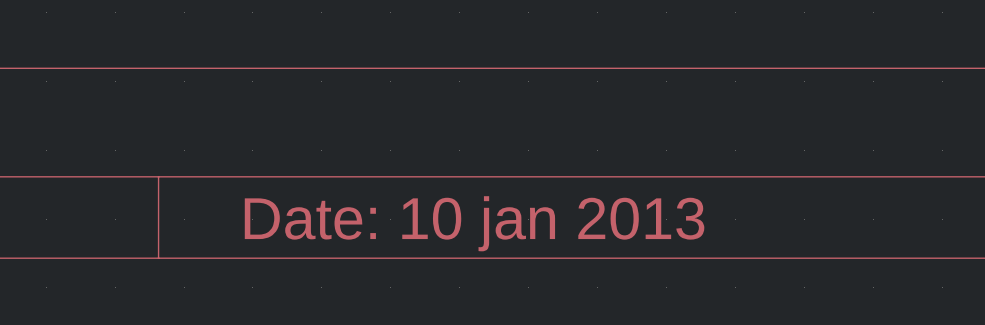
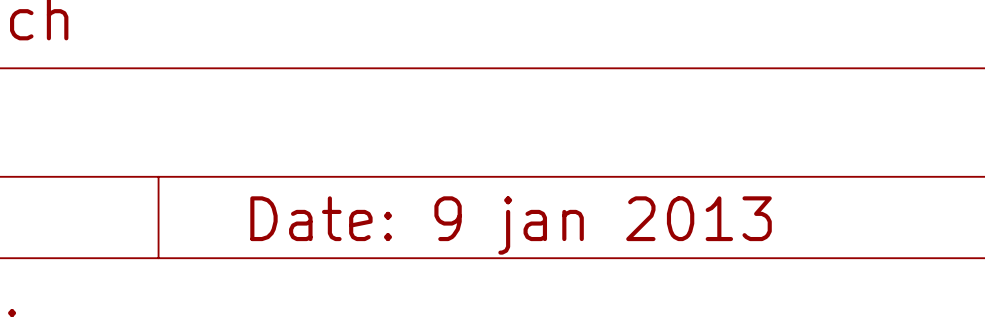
title block: Date: 10 jan 2013 (474, 223) -> Date: 9 jan 2013 (511, 225)

